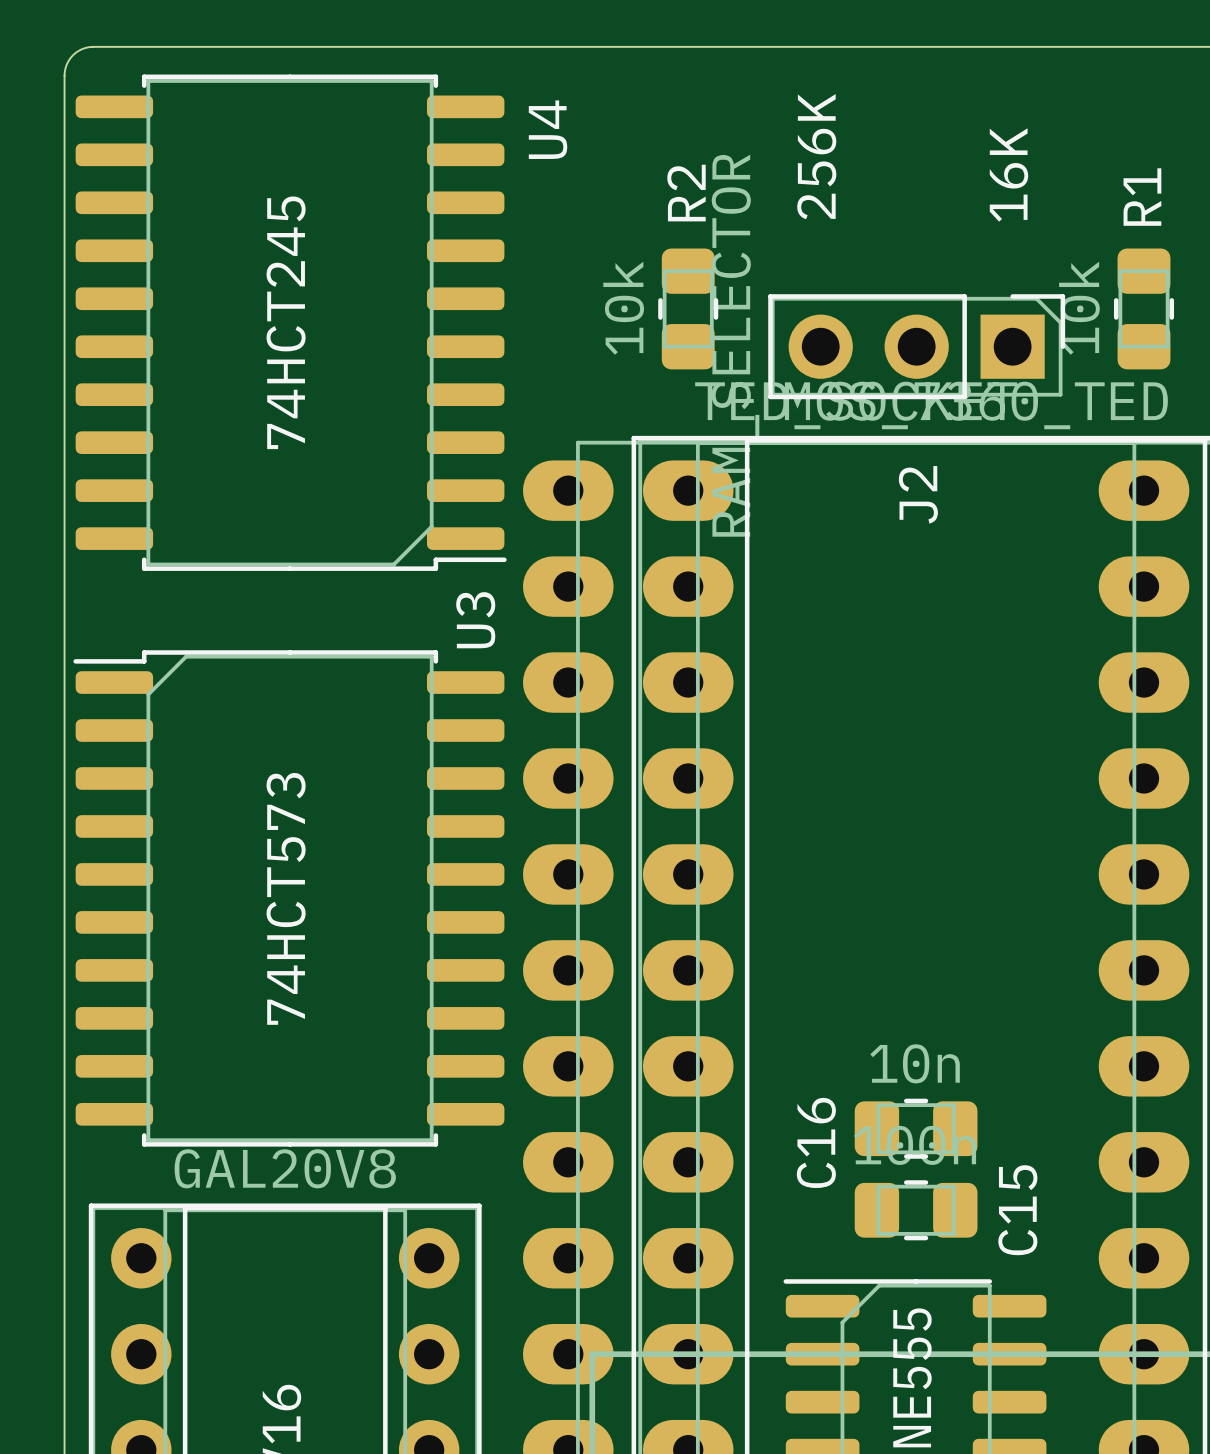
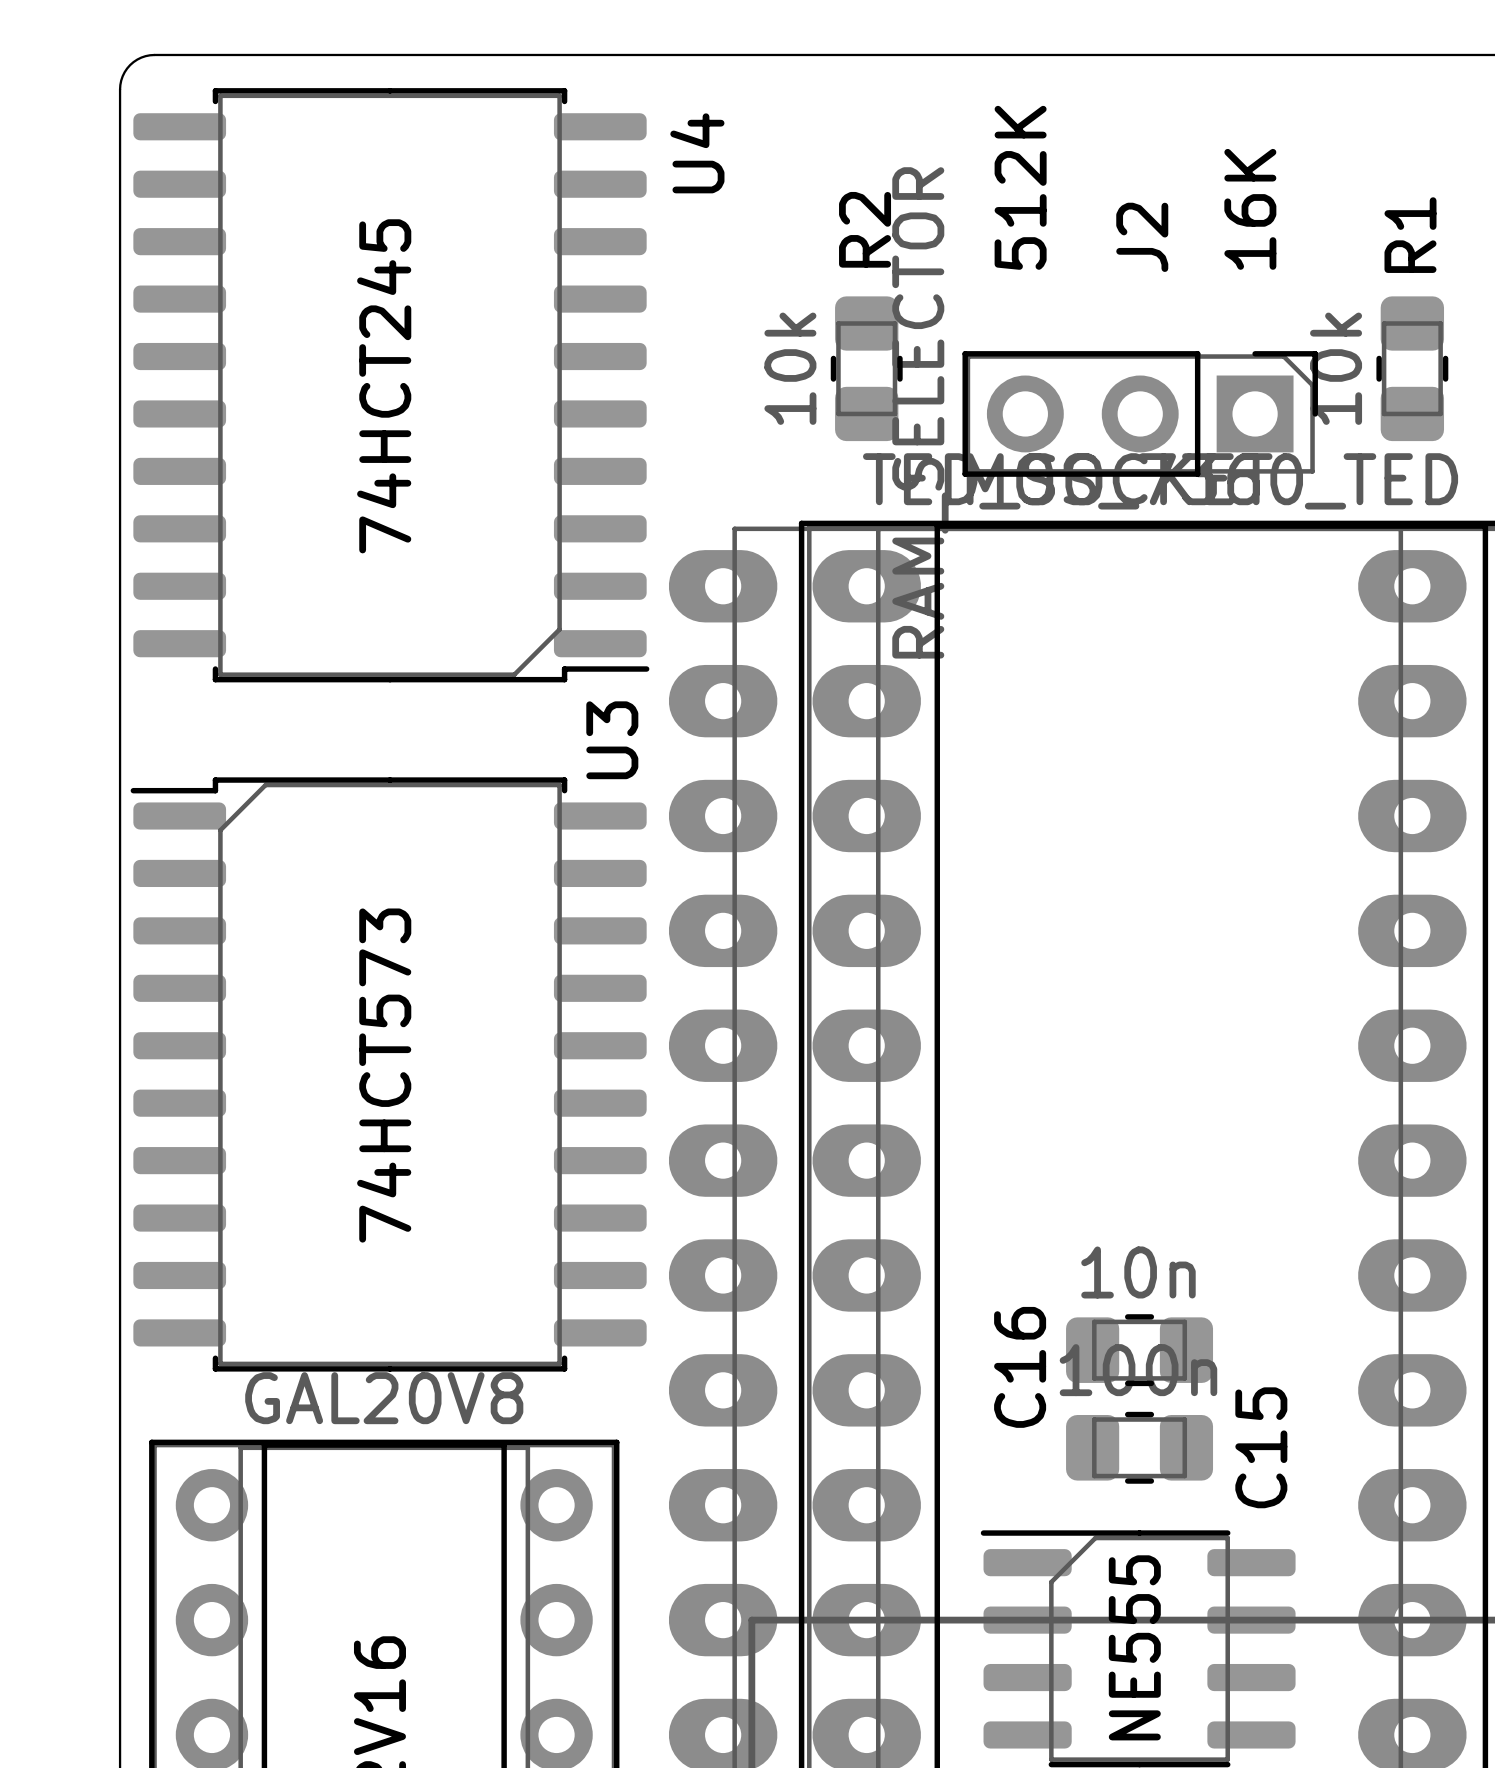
text: 256K (816, 156) -> 512K (1020, 187)
J2 name position: J2 (918, 494) -> J2 (1142, 237)

